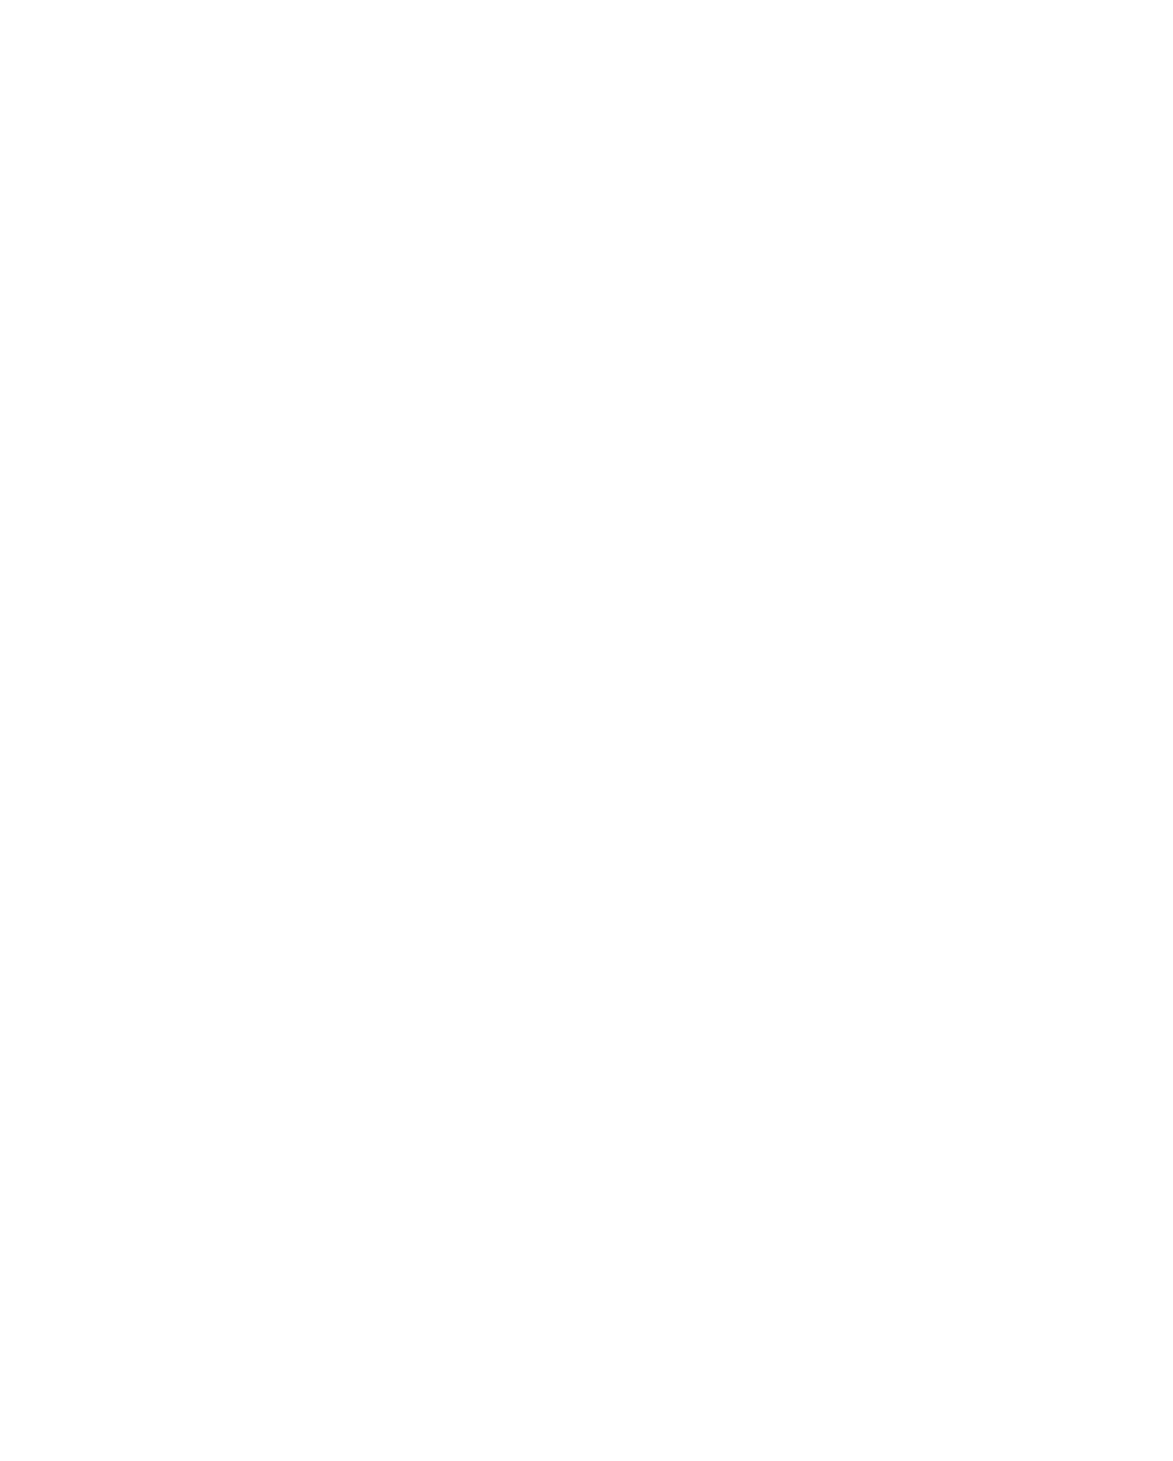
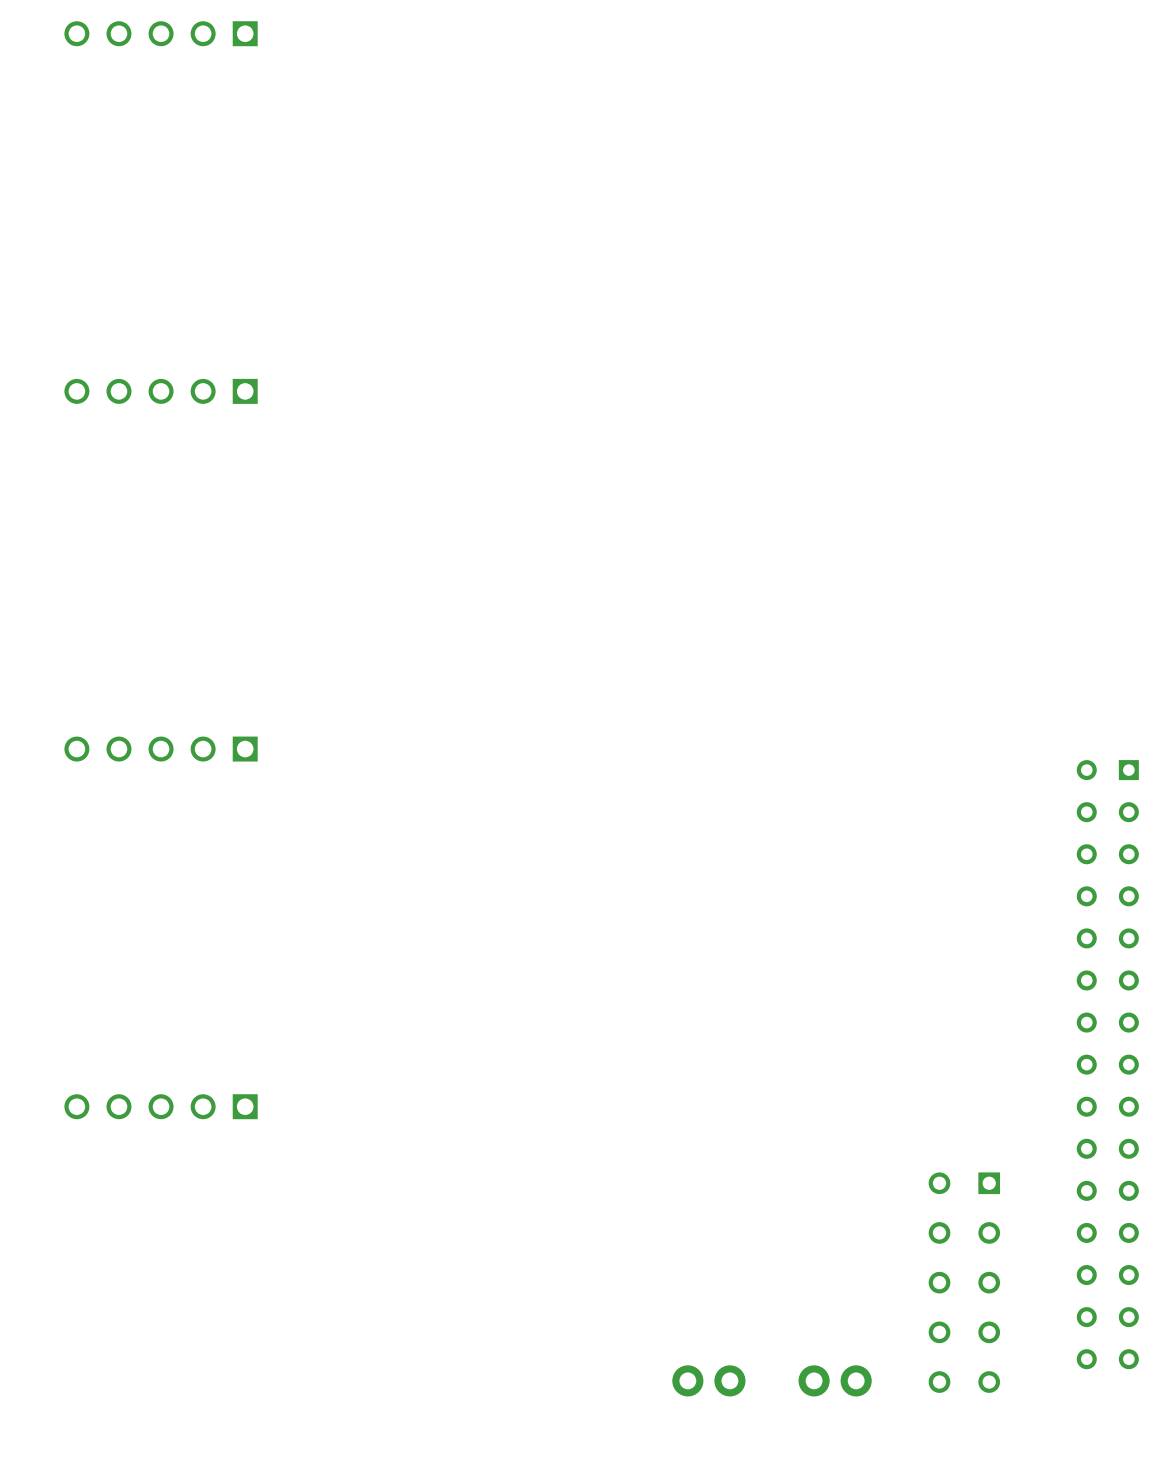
part: none -> (161, 33)
part: none -> (161, 391)
part: none -> (161, 749)
part: none -> (1107, 1064)
part: none -> (161, 1106)
part: none -> (964, 1282)
part: none -> (708, 1380)
part: none -> (835, 1380)

